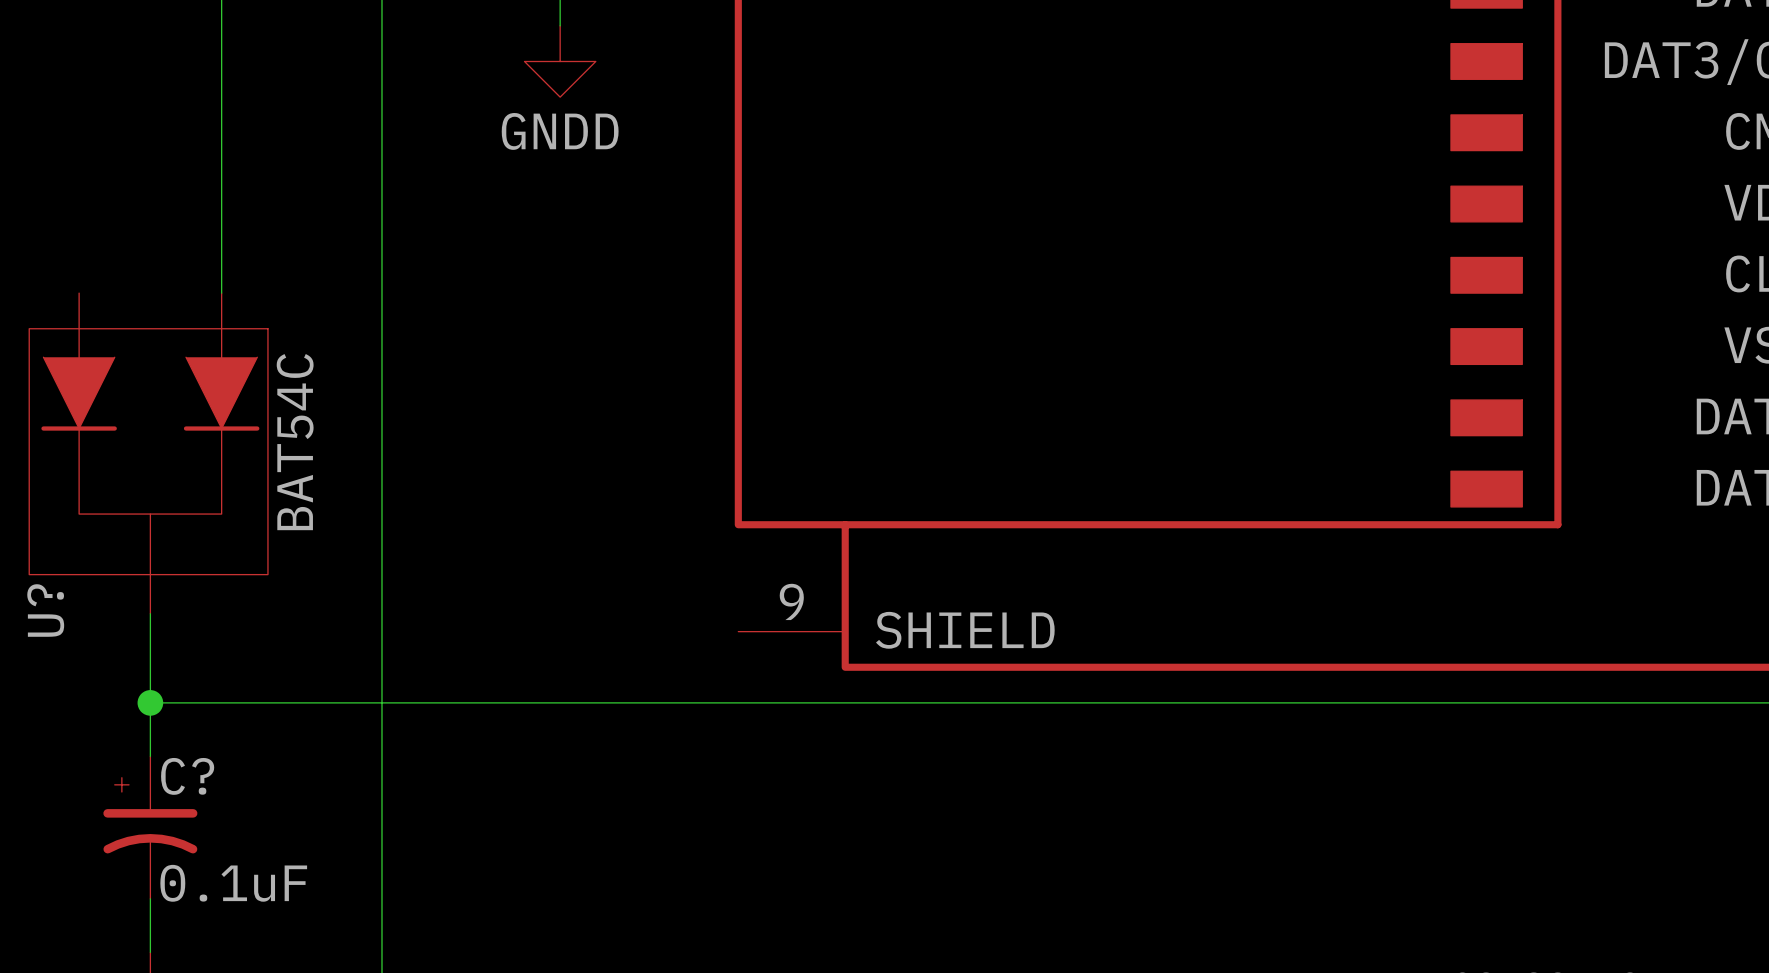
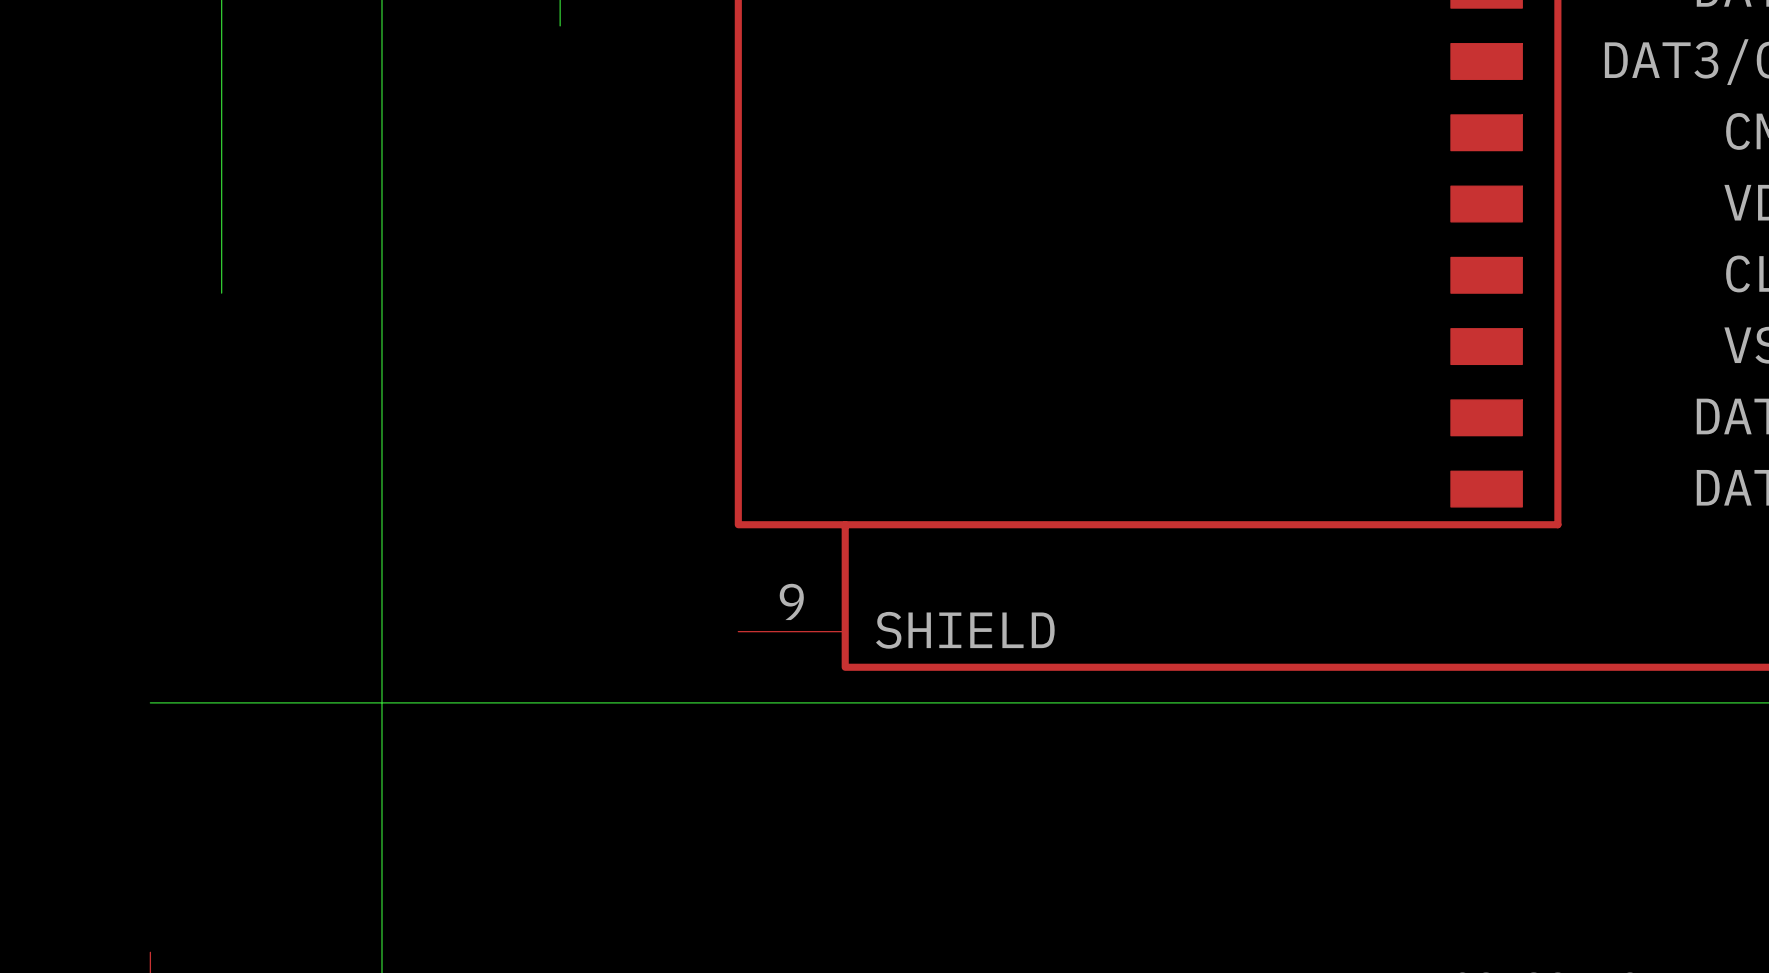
power symbol: GNDD (560, 61) -> none
U?: BAT54C (148, 453) -> none
wire: (150, 613) (150, 756) -> none
junction: (150, 702) -> none
C?: 0.1uF (150, 827) -> none
wire: (150, 898) (150, 952) -> none

